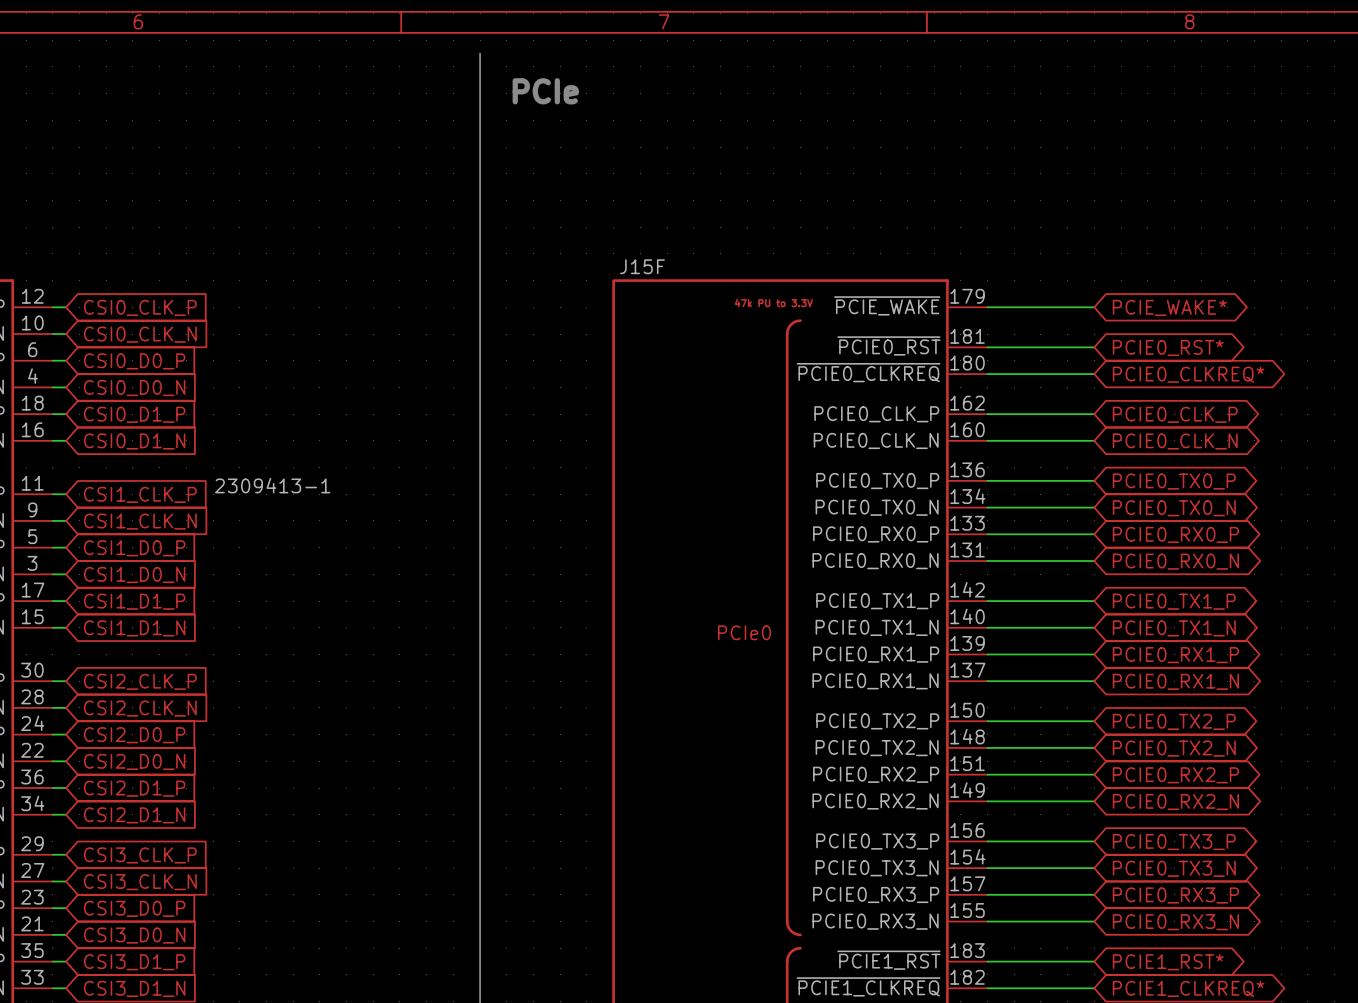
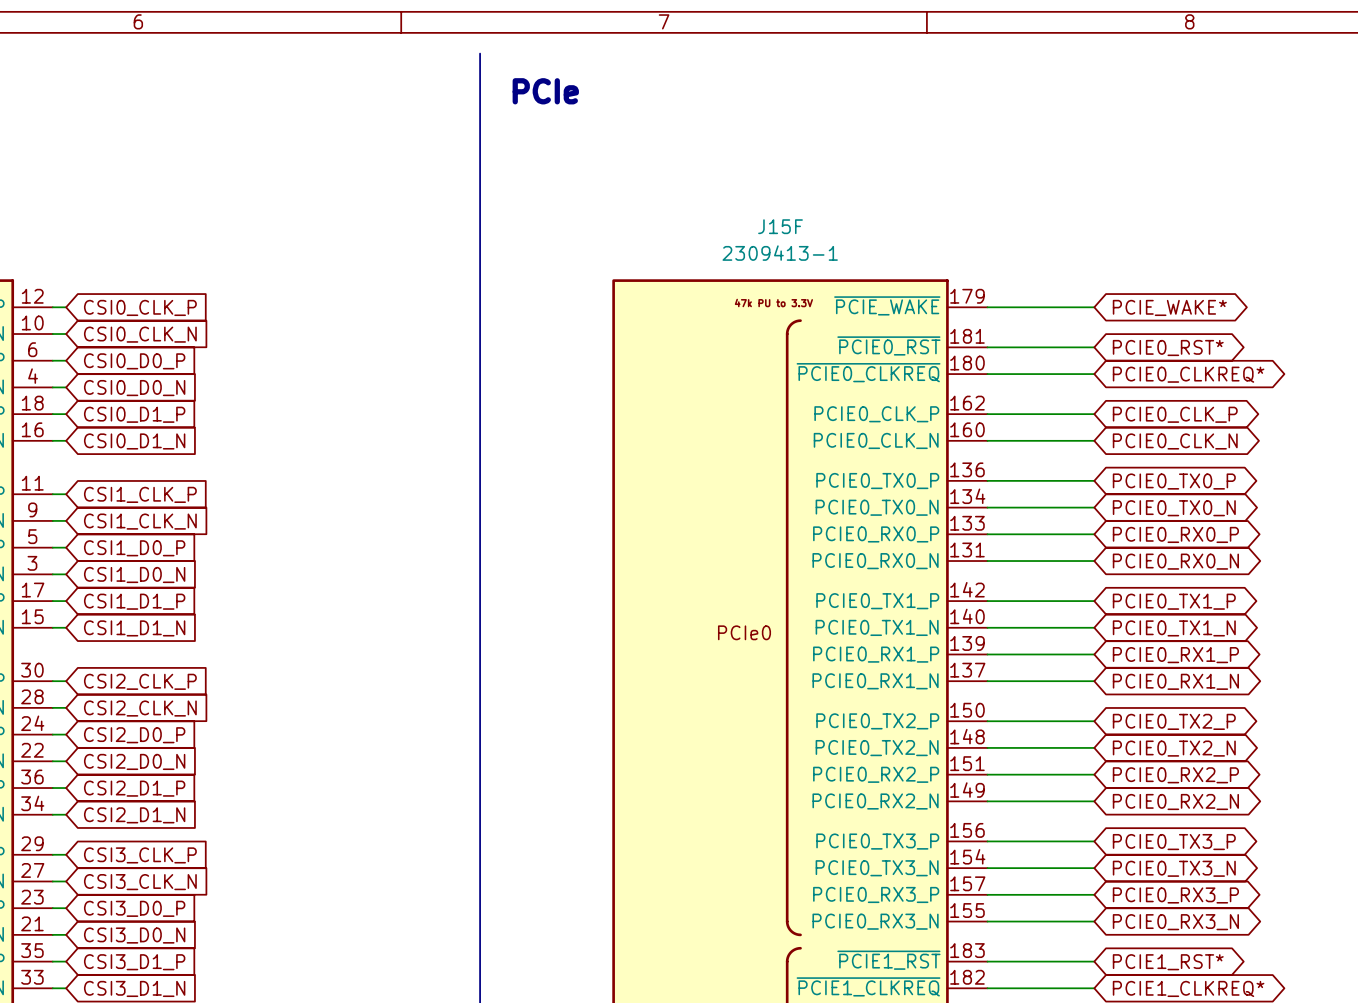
J15F name position: J15F (642, 266) -> J15F (780, 226)
J15F text position: 2309413-1 (272, 485) -> 2309413-1 (780, 253)

